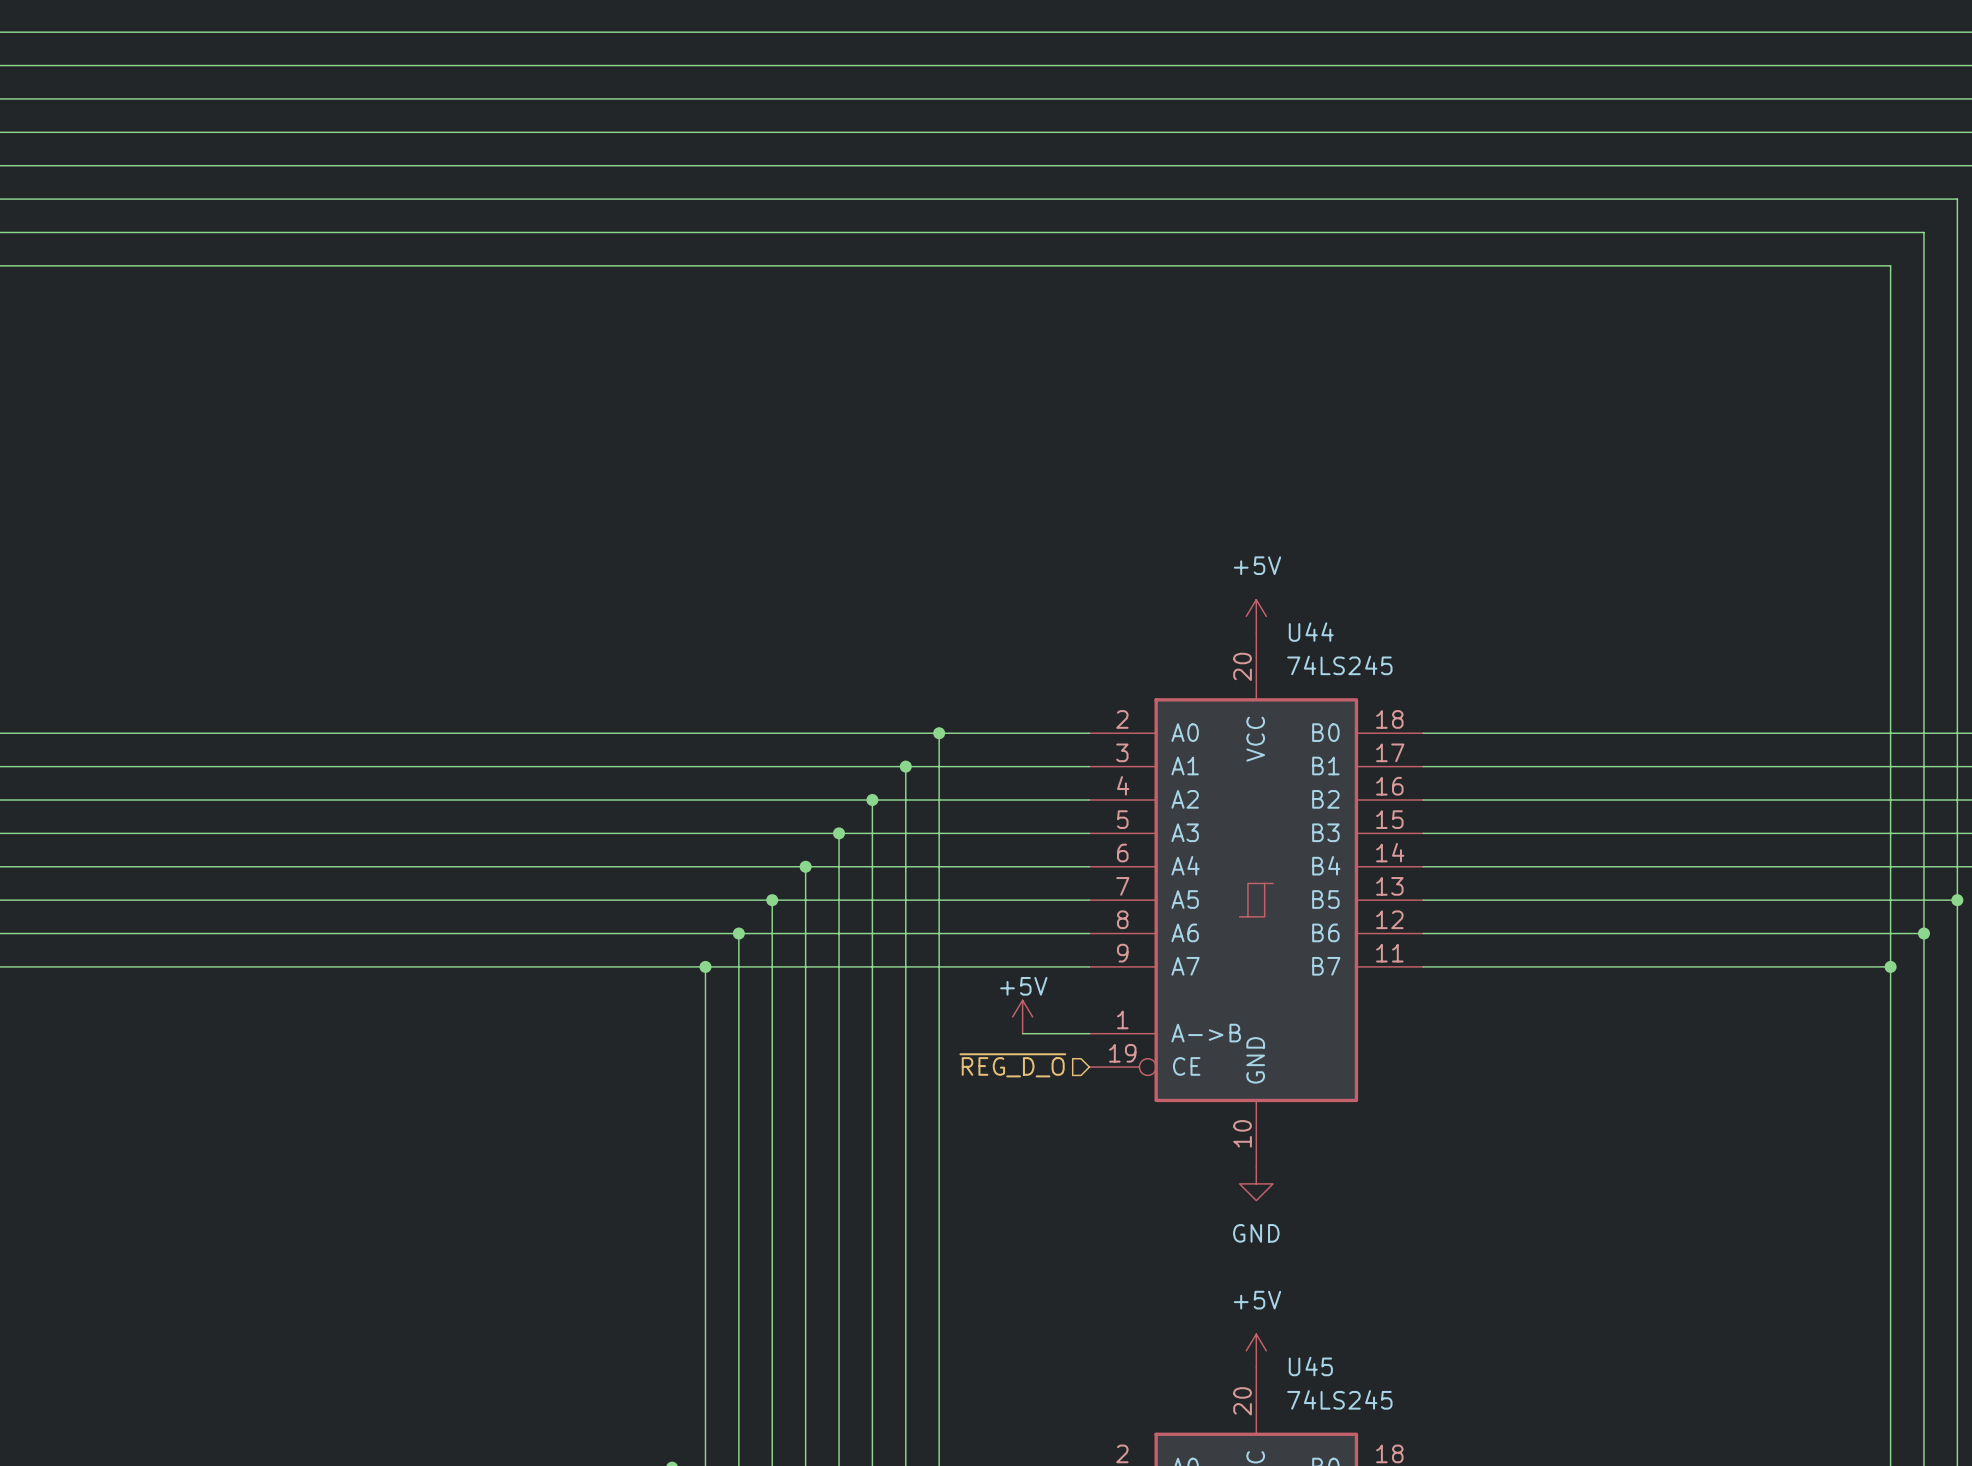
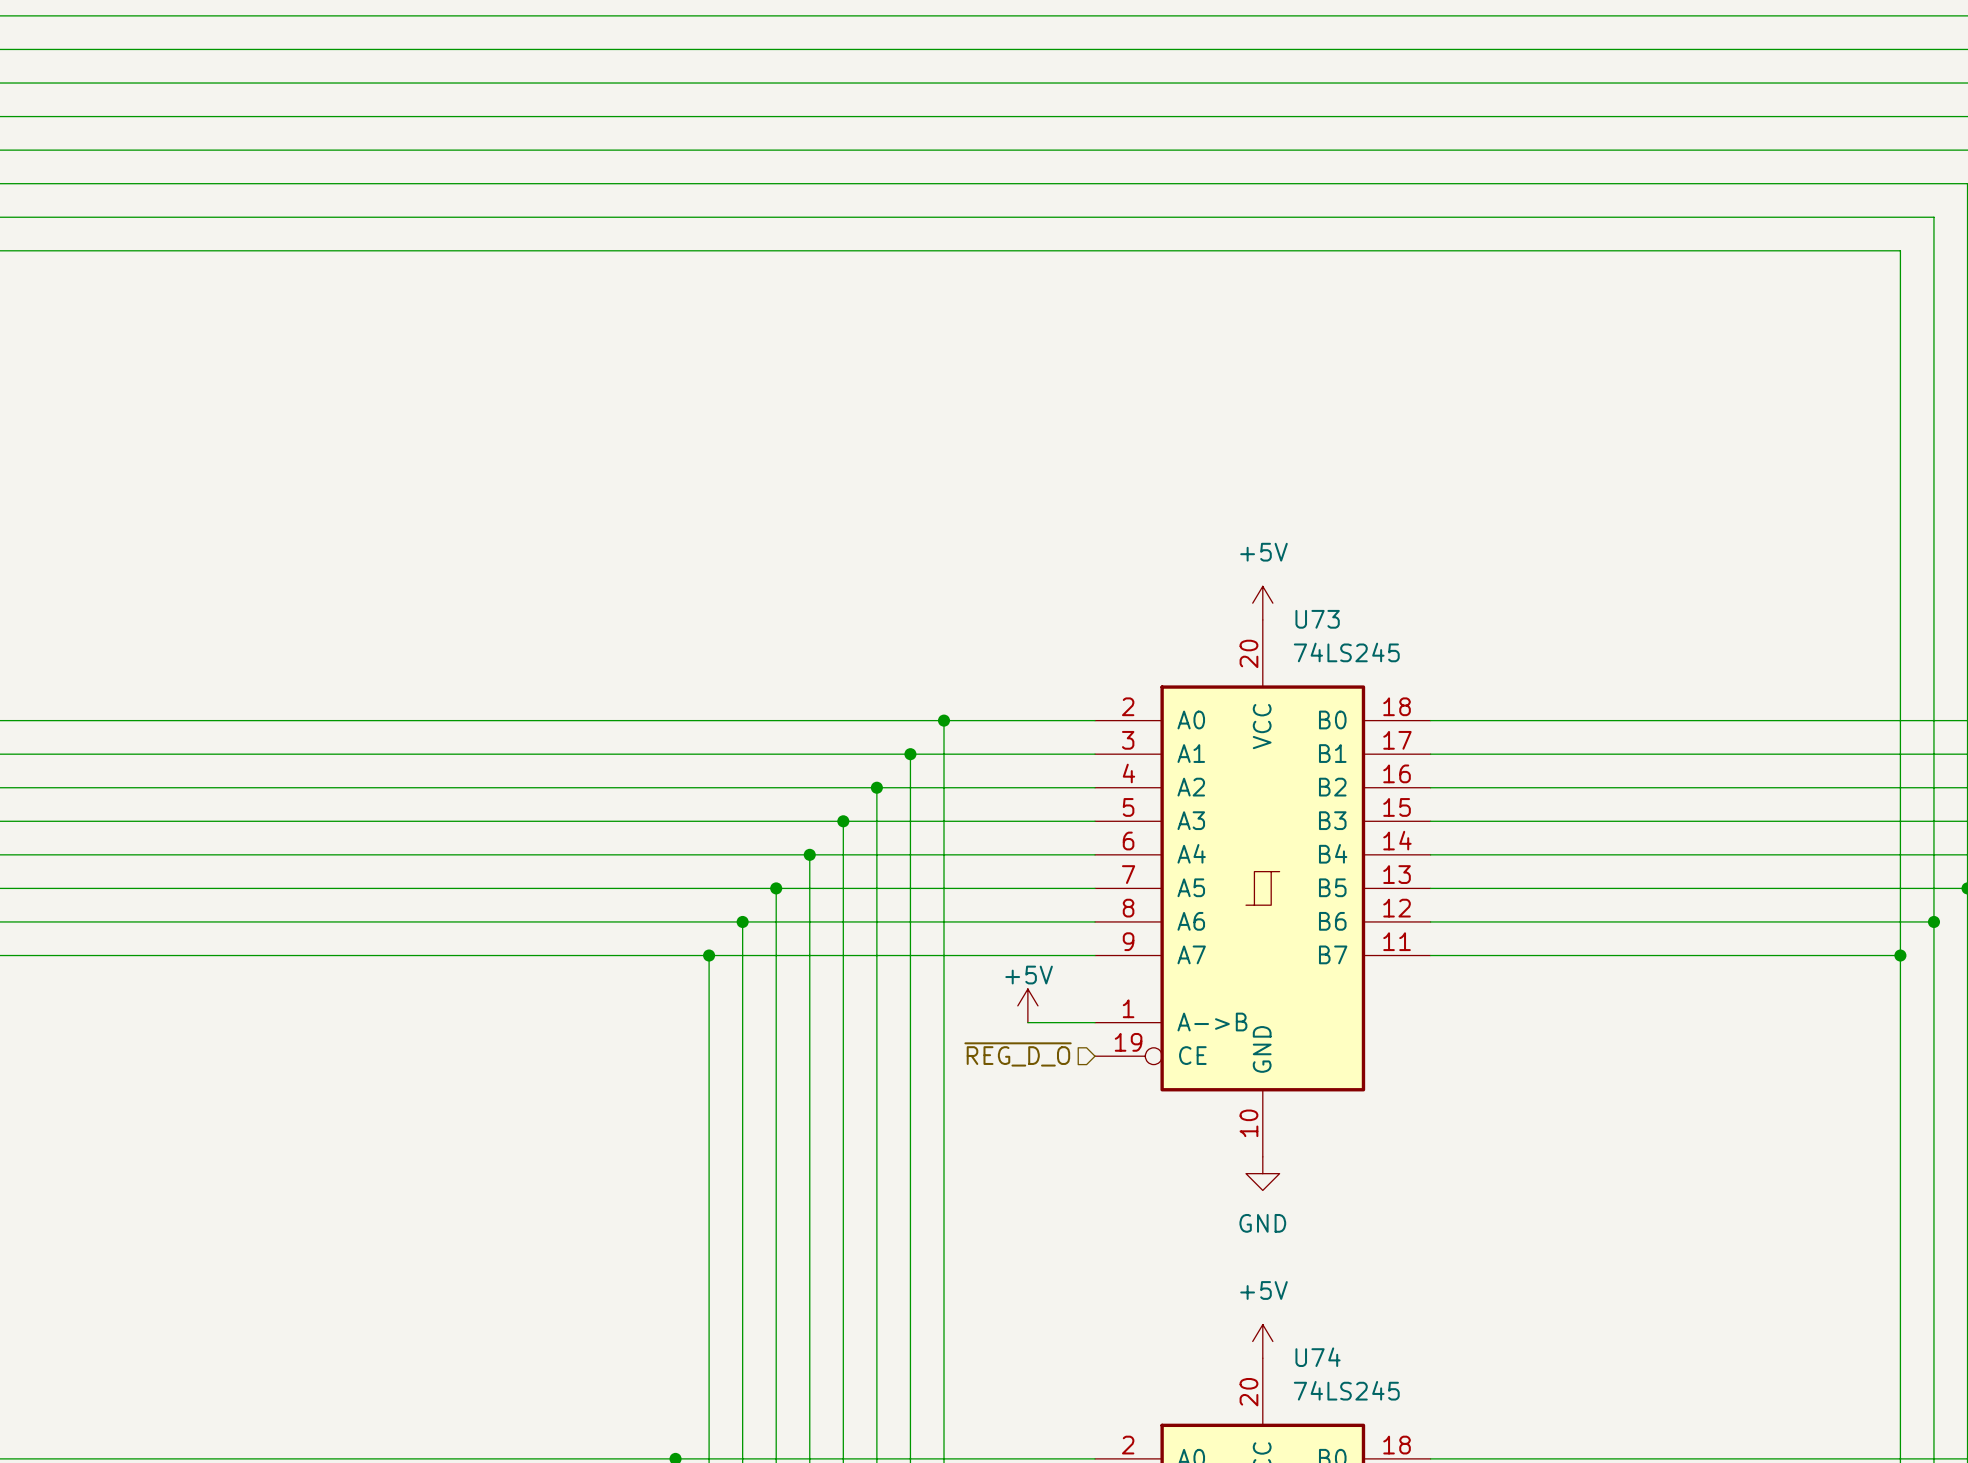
U44 name: U44 (1311, 632) -> U73 (1317, 619)
U45 name: U45 (1310, 1366) -> U74 (1318, 1357)

